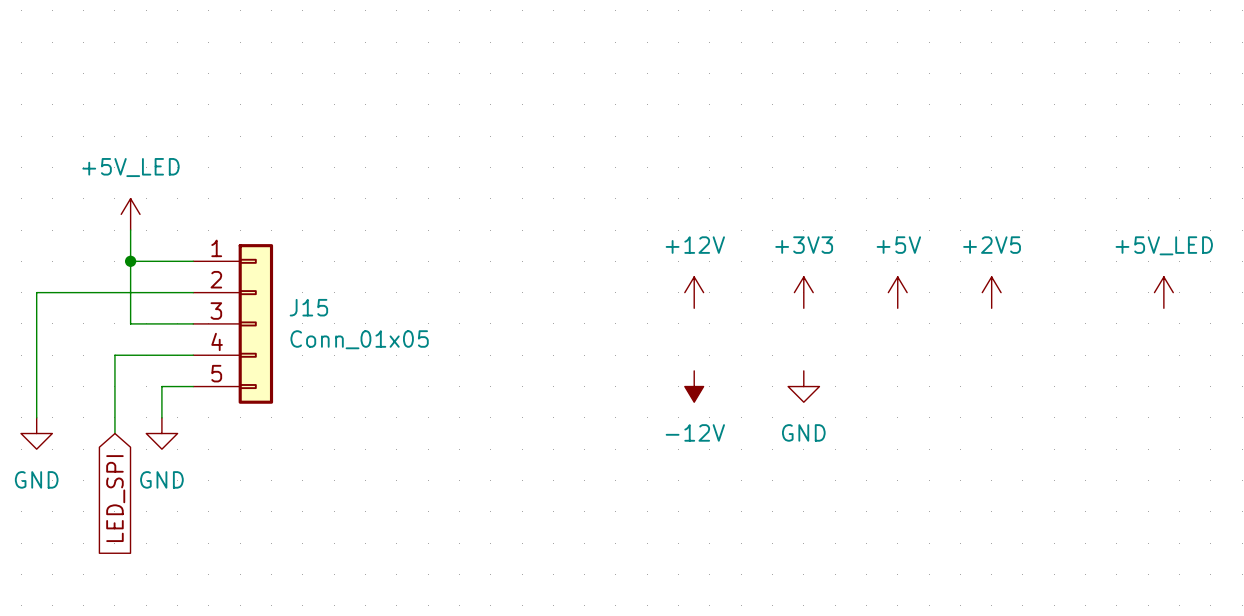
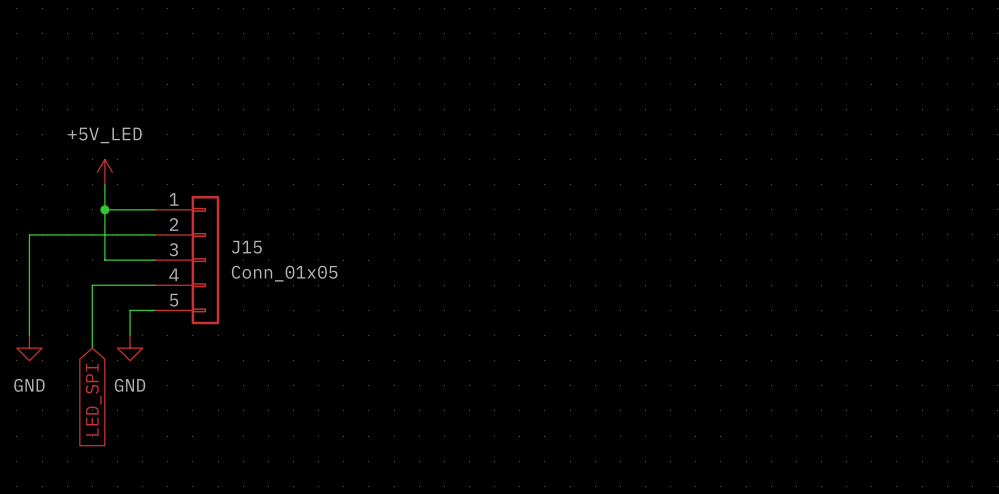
power symbol: +12V (694, 292) -> none
power symbol: +3V3 (803, 292) -> none
power symbol: +5V (897, 292) -> none
power symbol: +2V5 (991, 292) -> none
power symbol: +5V_LED (1163, 292) -> none
power symbol: -12V (694, 386) -> none
power symbol: GND (803, 386) -> none

